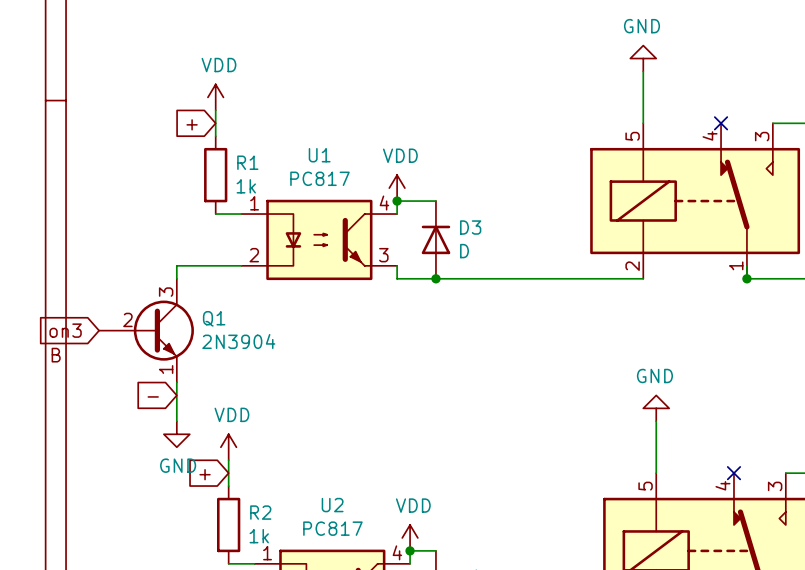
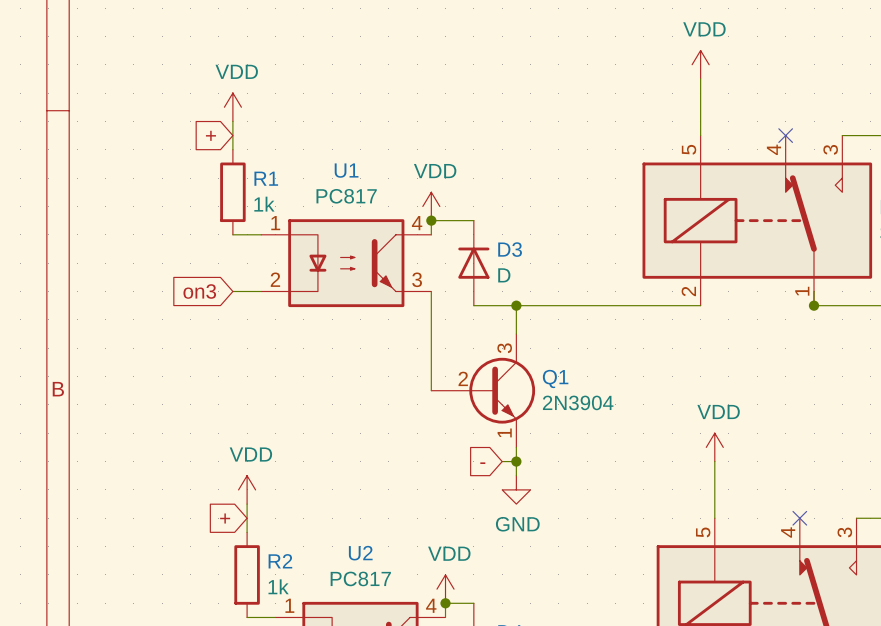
power symbol: GND (643, 58) -> VDD (700, 64)
wire: (215, 265) (176, 265) (176, 278) -> none
wire: (397, 278) (435, 278) -> (431, 305) (431, 390)
junction position: (435, 278) -> (516, 305)
wire: none -> (516, 305) (516, 334)
global label position: on3 (65, 330) -> on3 (199, 291)
Q1 position: (146, 330) -> (483, 390)
wire: (176, 382) (176, 421) -> none
global label: - (153, 396) -> none
wire: none -> (516, 447) (516, 475)
power symbol: GND (656, 408) -> VDD (714, 447)
wire: none -> (502, 461) (516, 461)
junction: none -> (516, 461)
global label: none -> - (482, 463)
power symbol: GND (176, 434) -> none
power symbol: none -> GND (516, 489)

